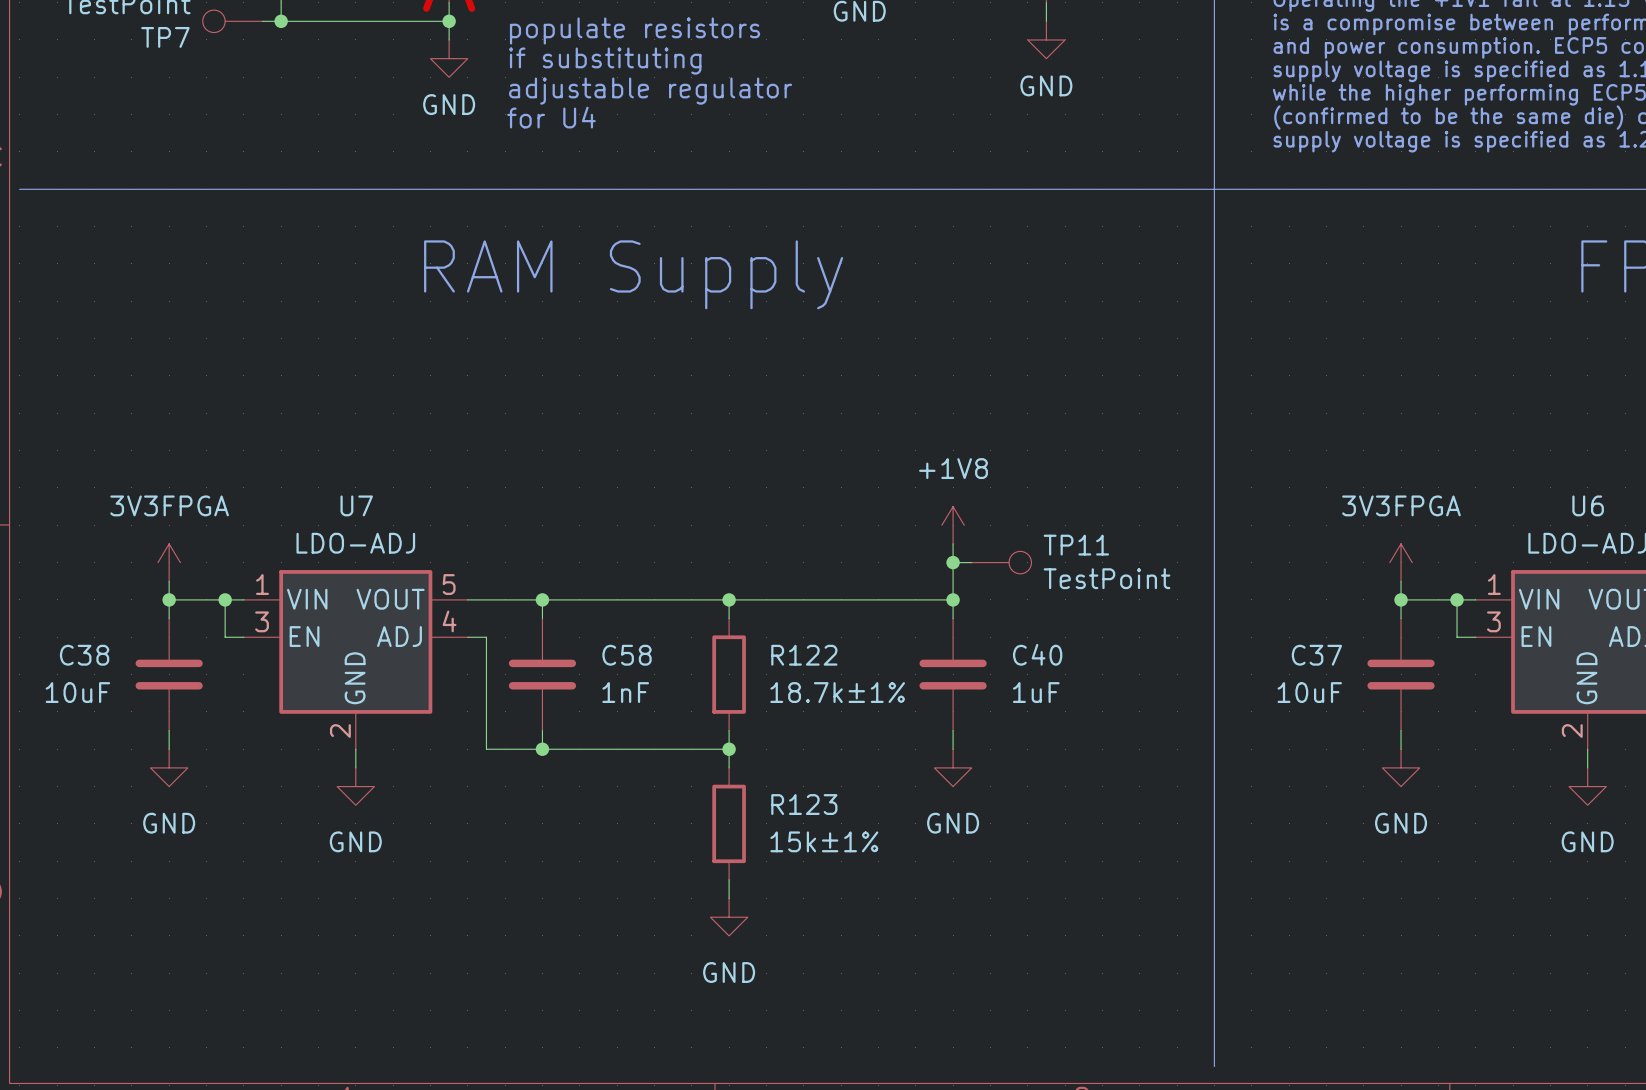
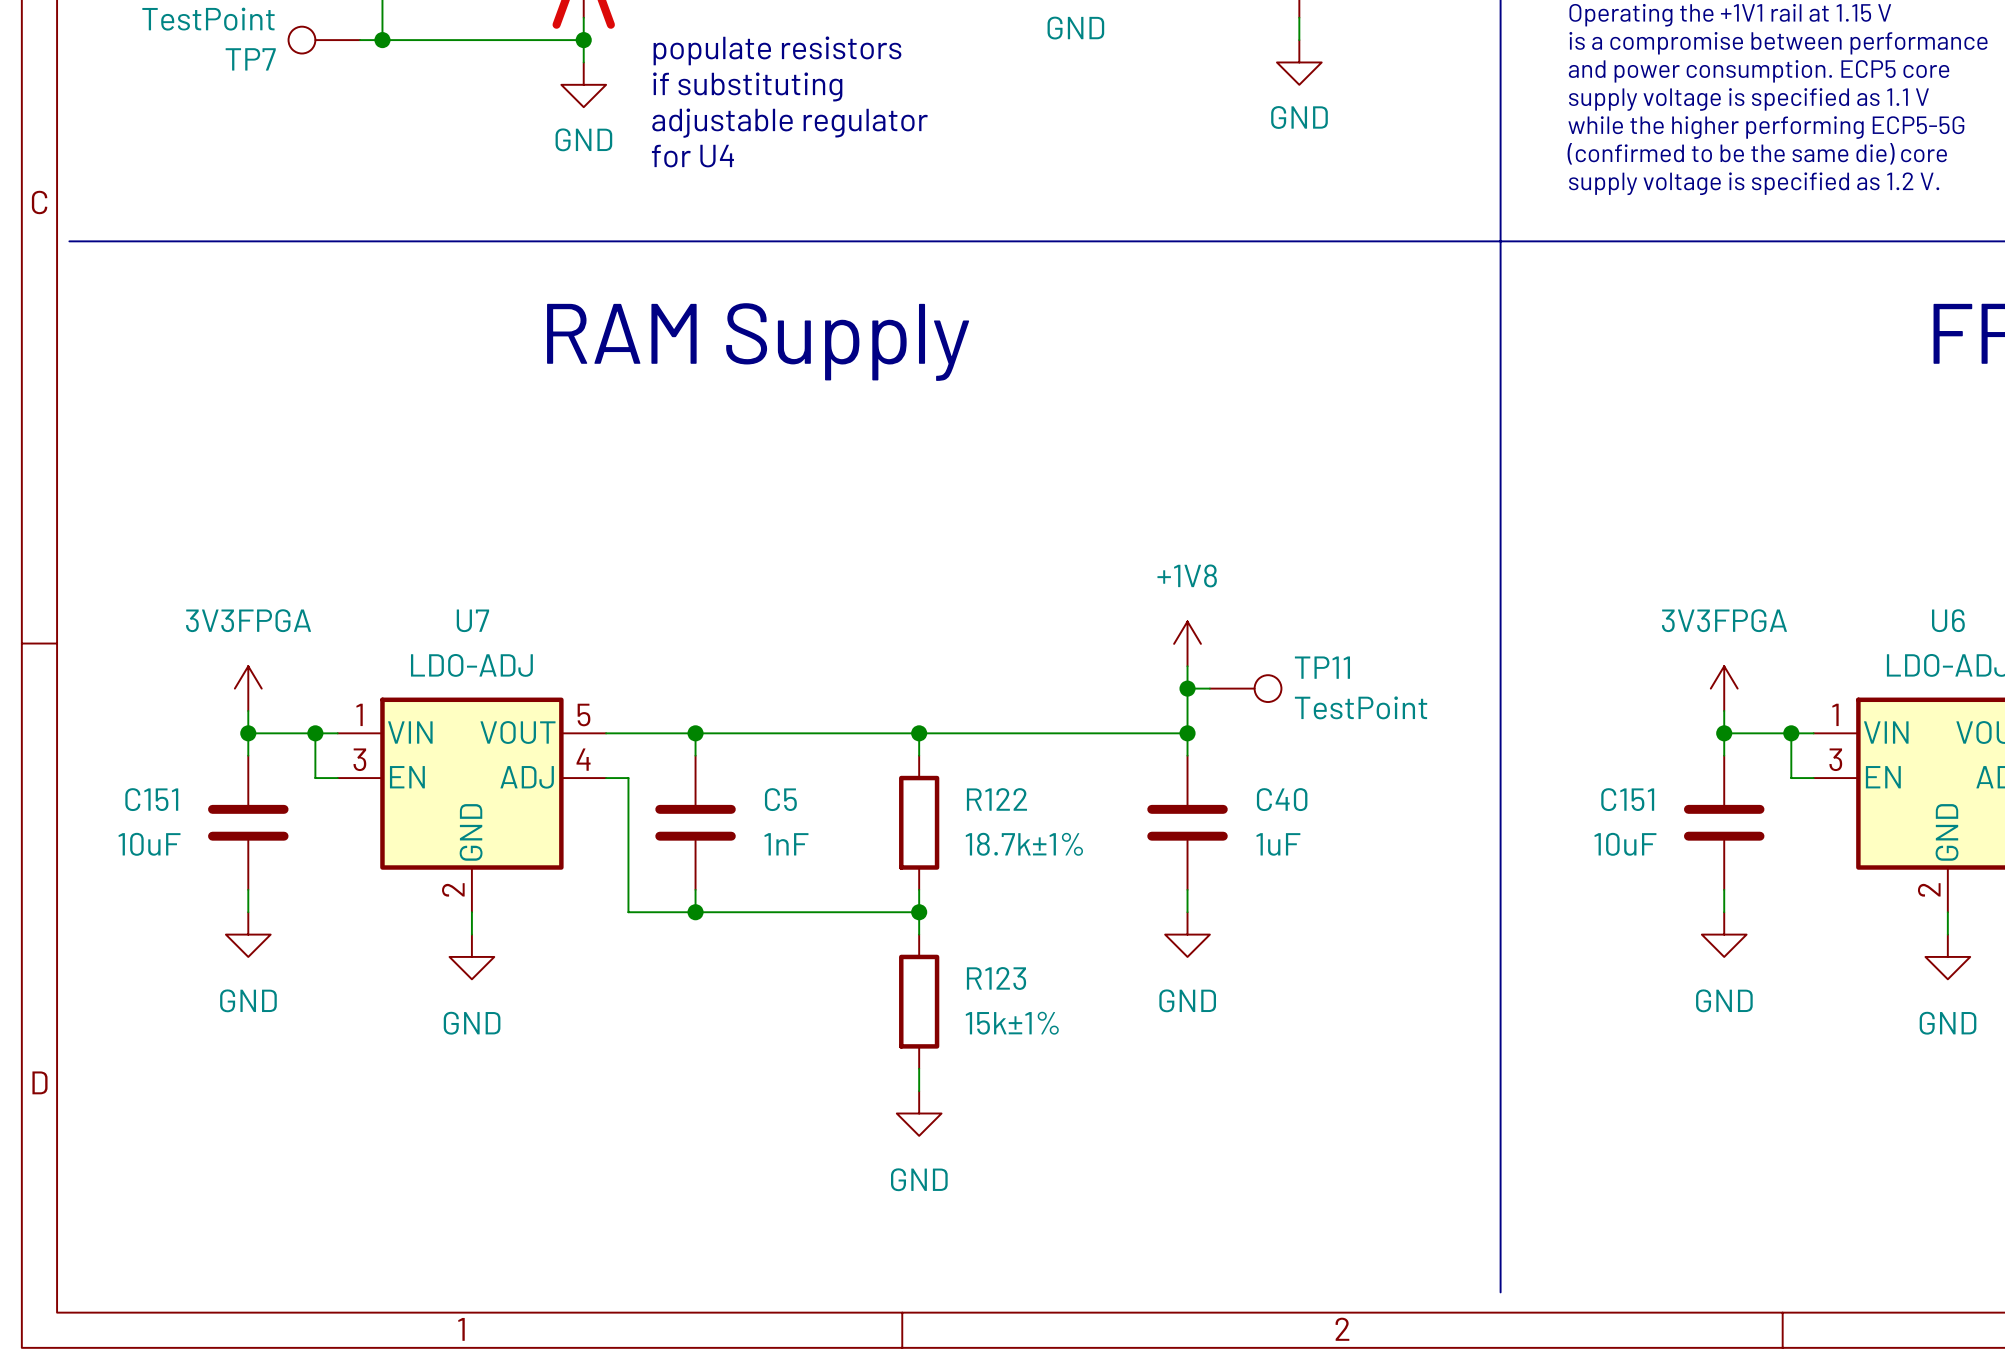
C38 name: C38 (84, 655) -> C151 (151, 799)
C58 name: C58 (627, 655) -> C5 (780, 799)
C37 name: C37 (1316, 655) -> C151 (1627, 799)

